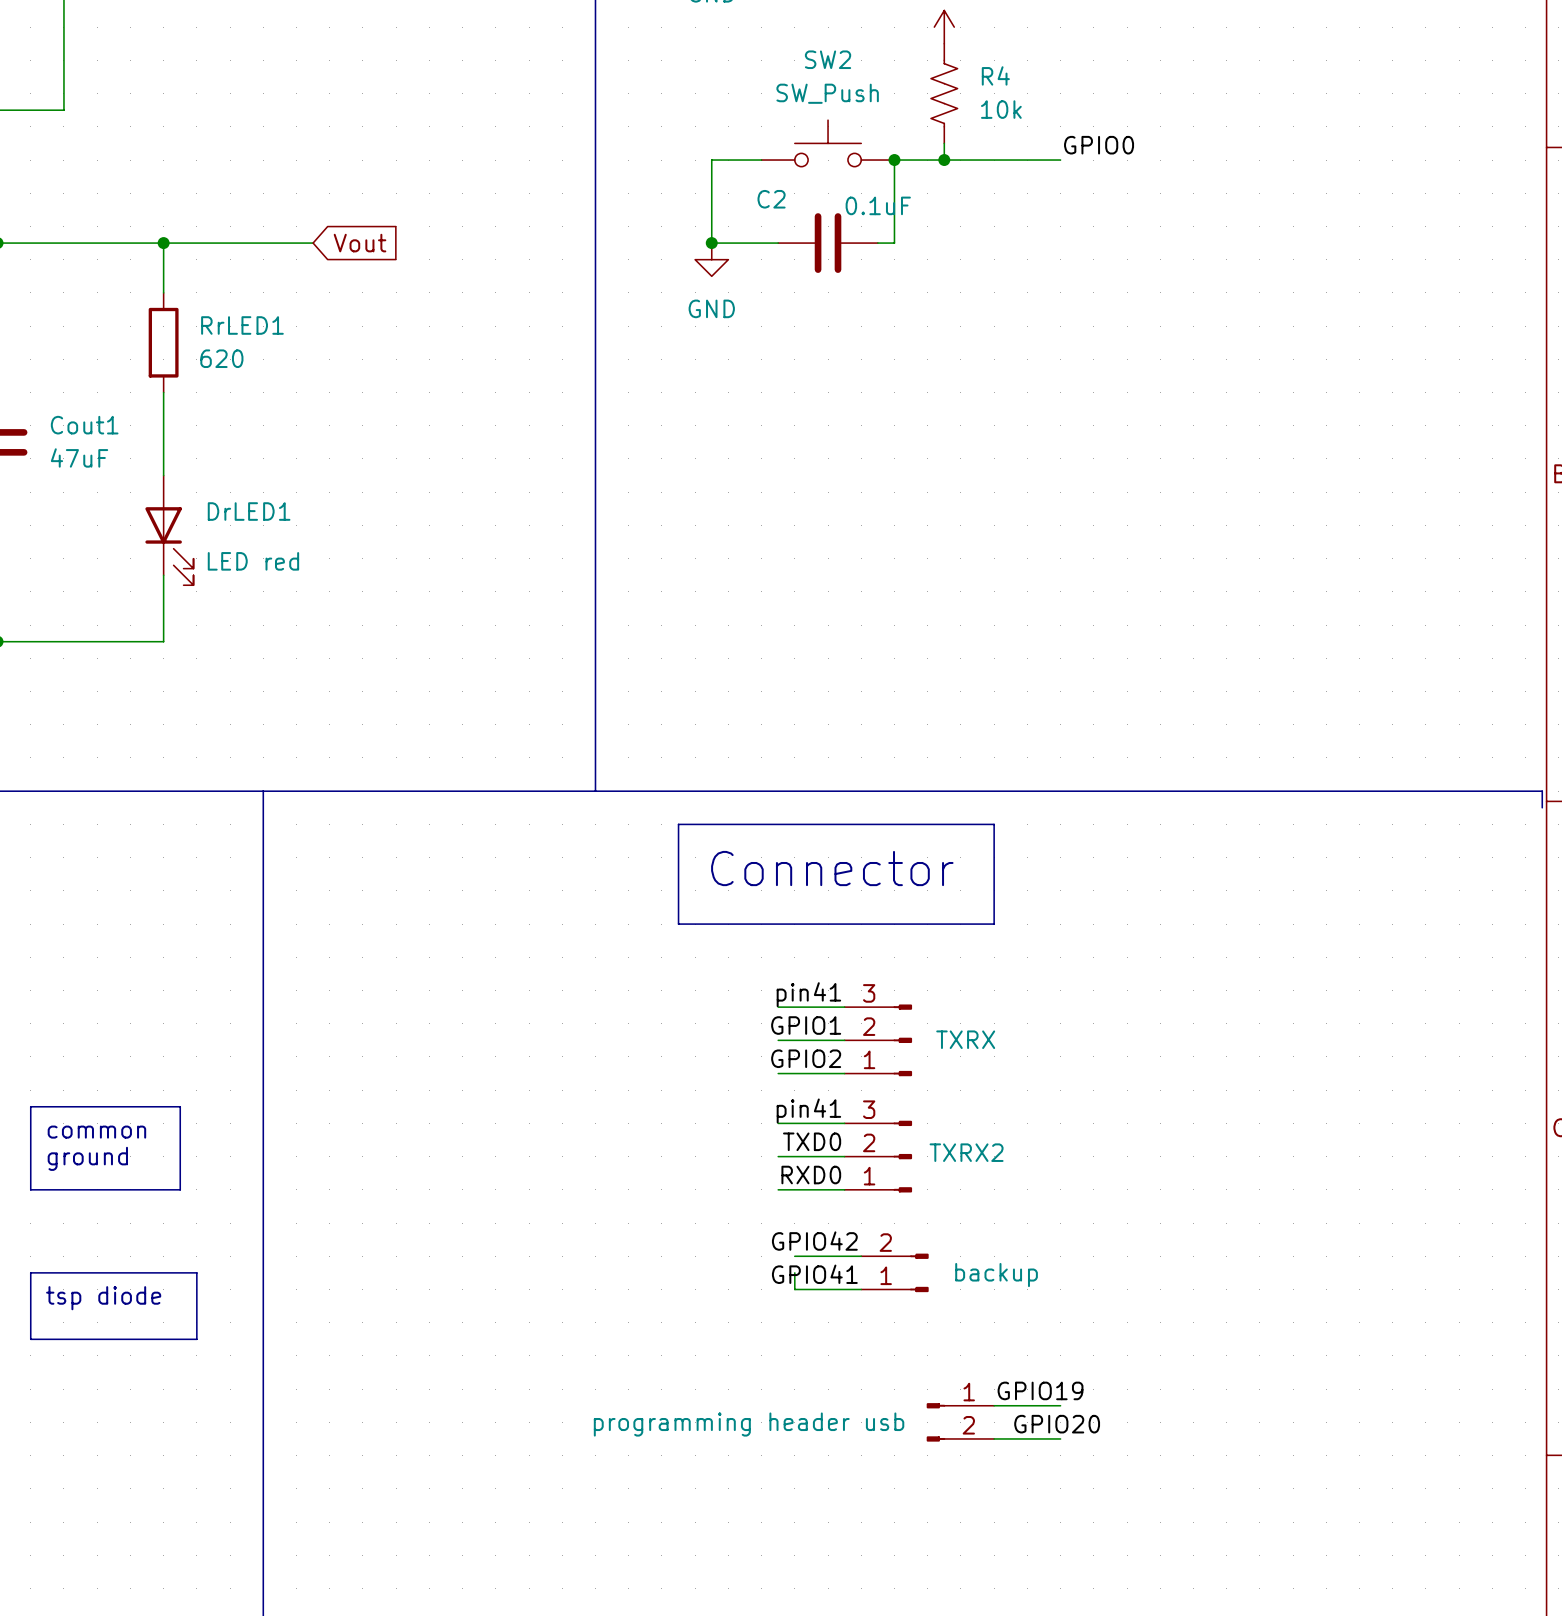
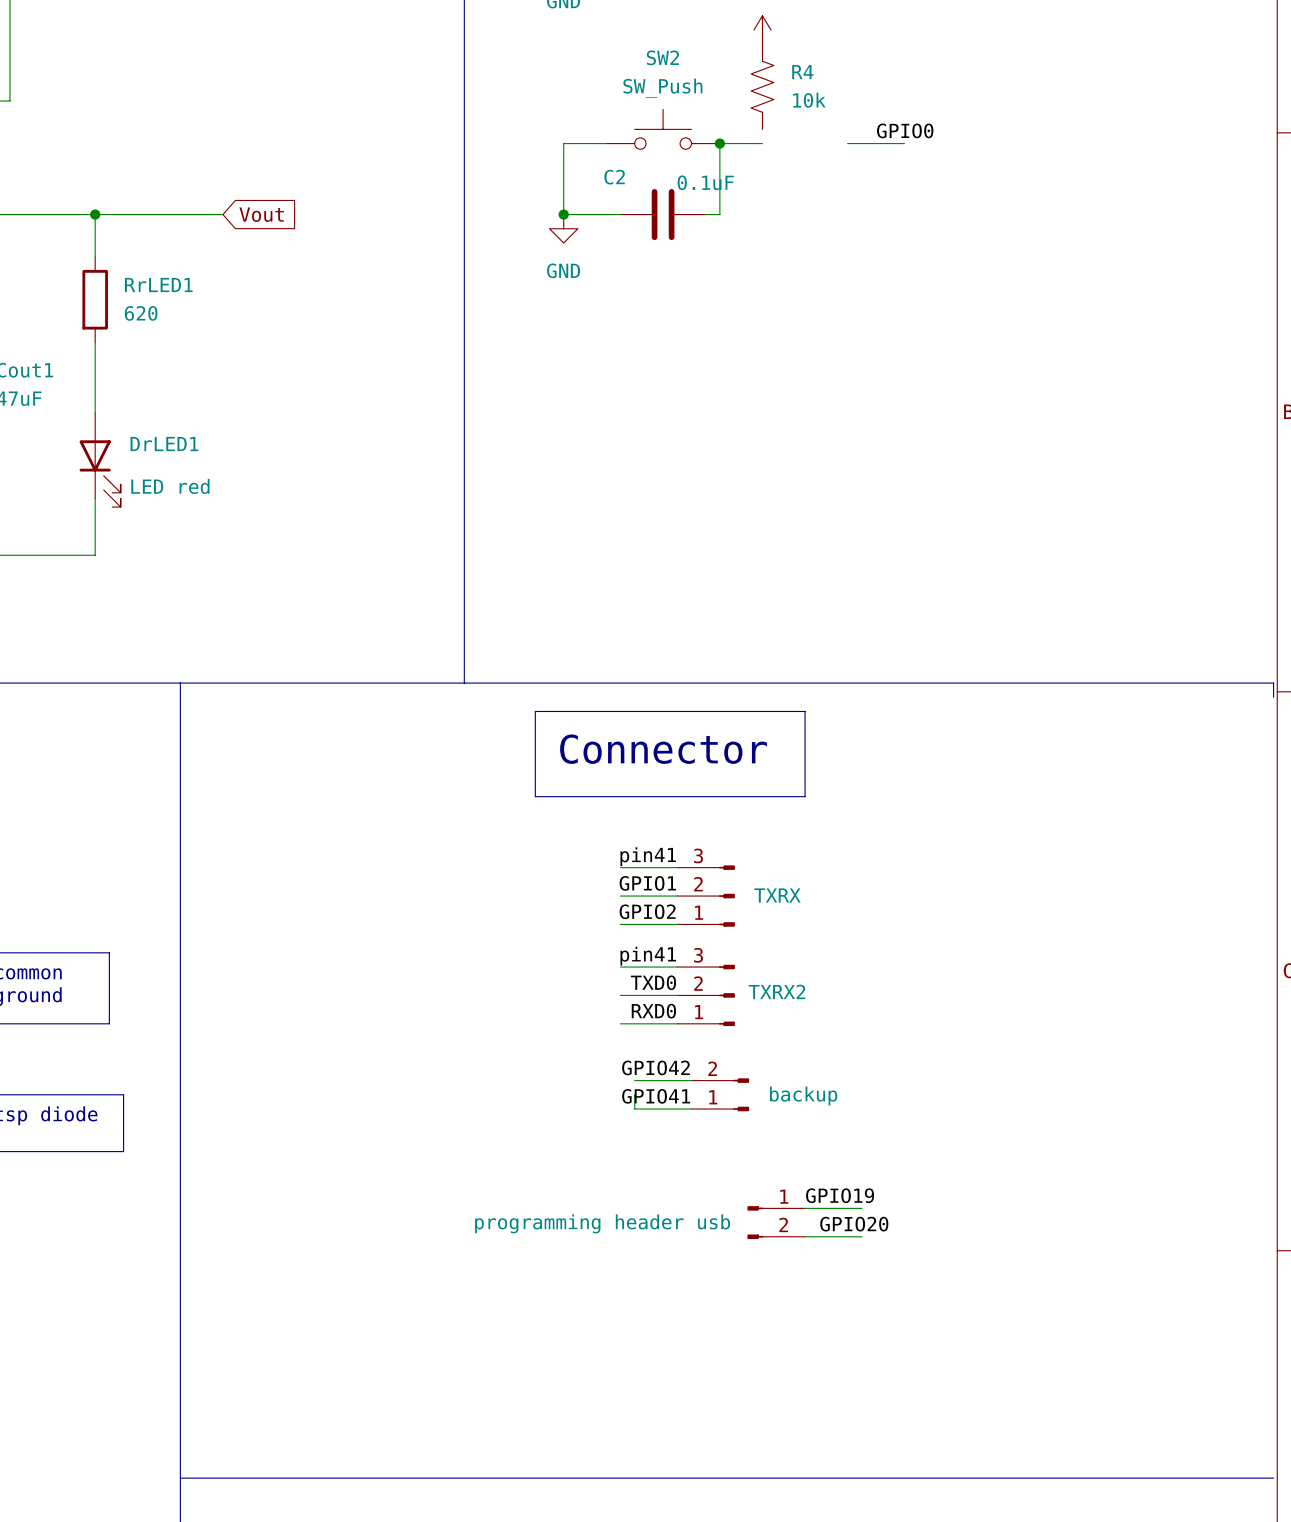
wire: (944, 143) (944, 160) (1043, 160) -> none
label position: GPIO0 (1099, 145) -> GPIO0 (905, 130)
junction: (944, 160) -> none
wire: none -> (861, 143) (904, 143)

